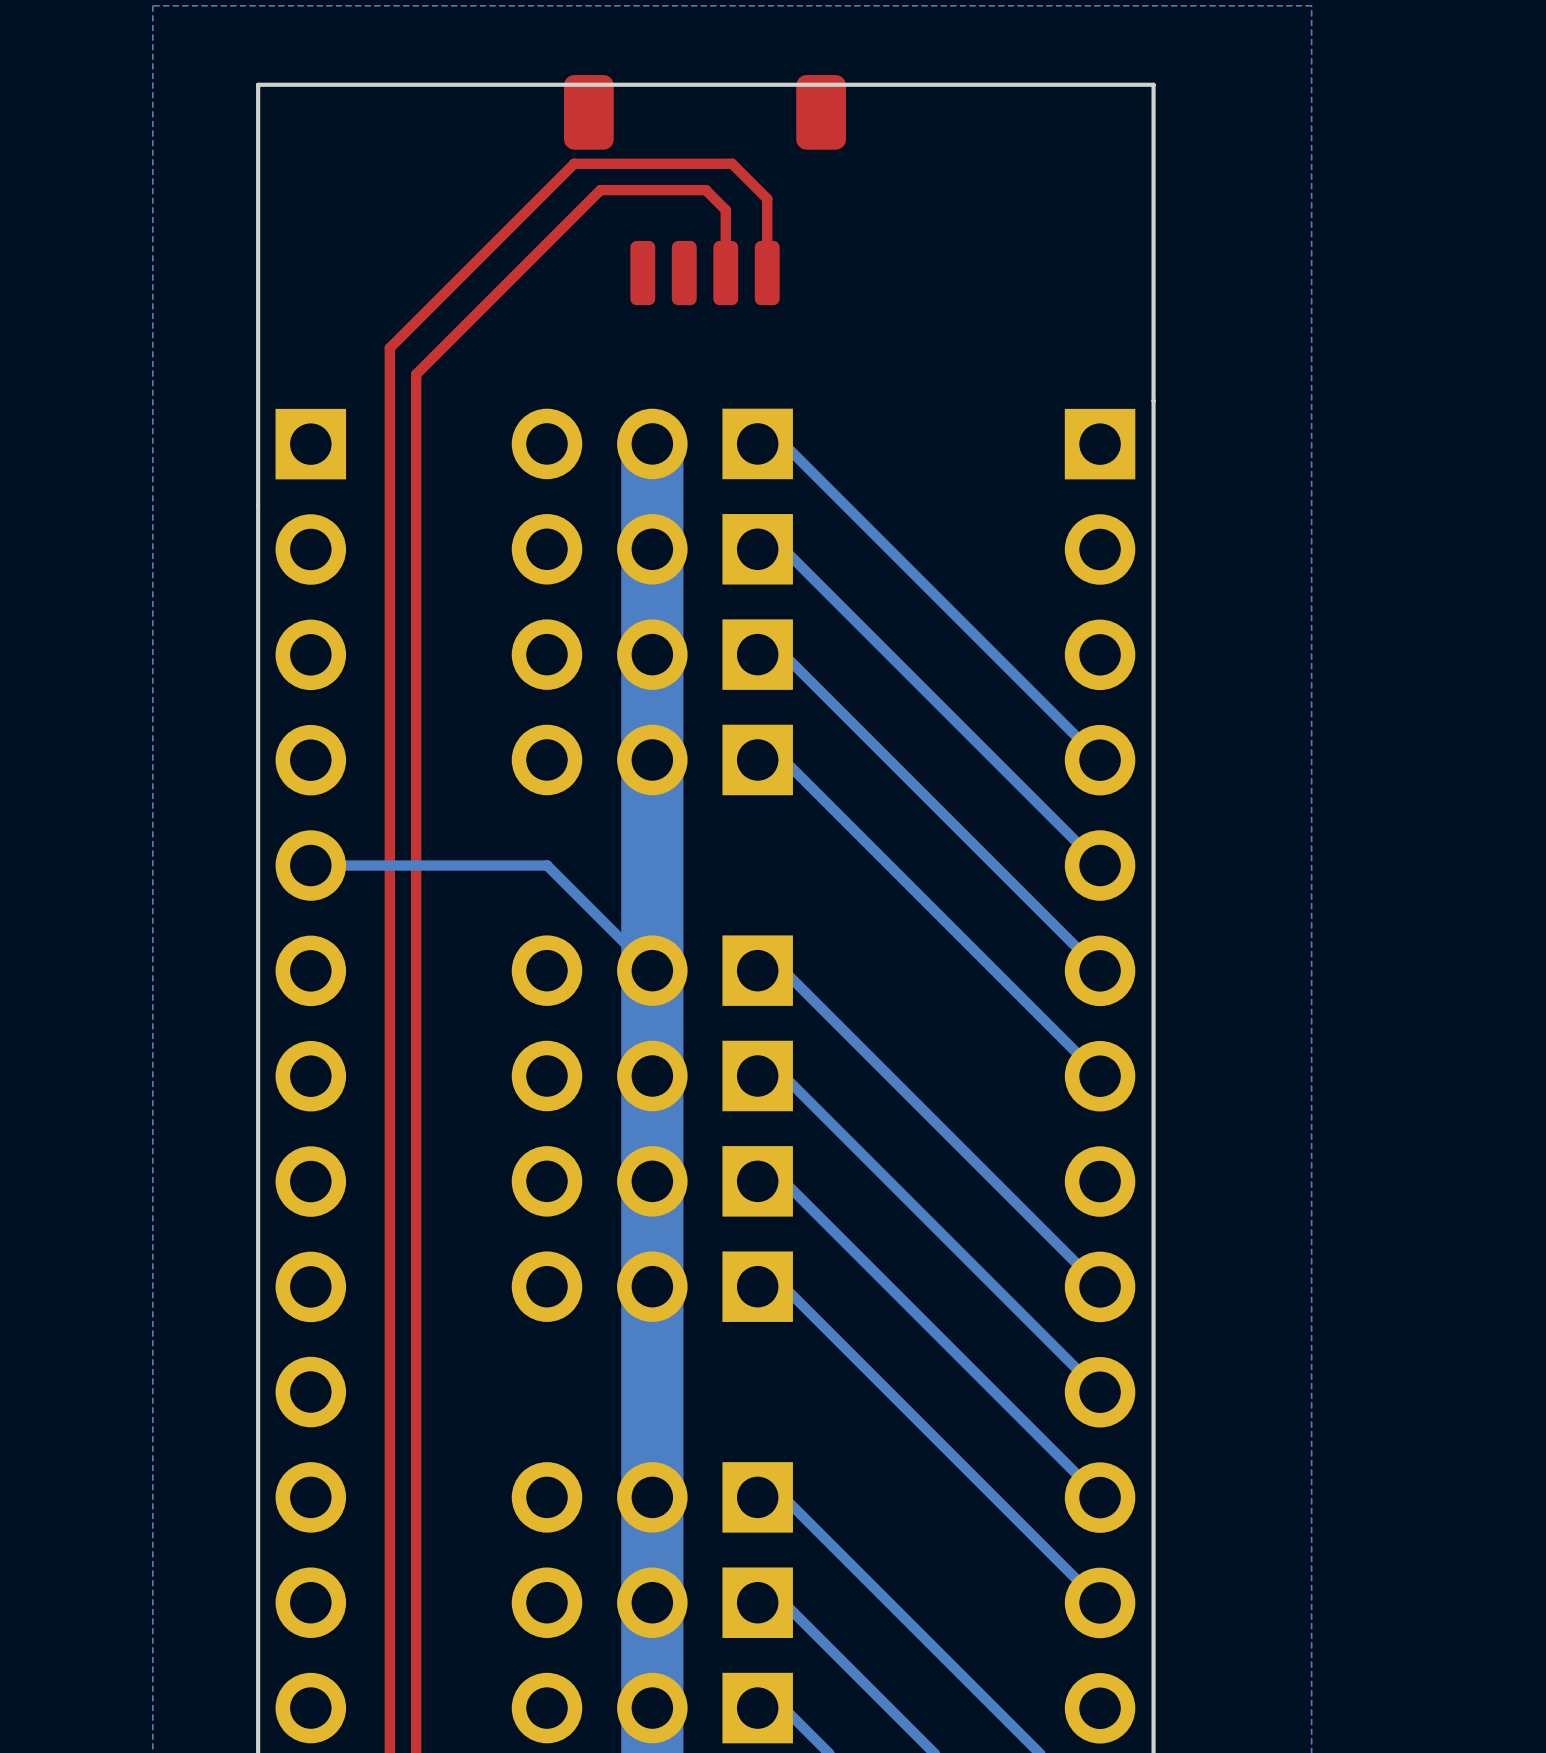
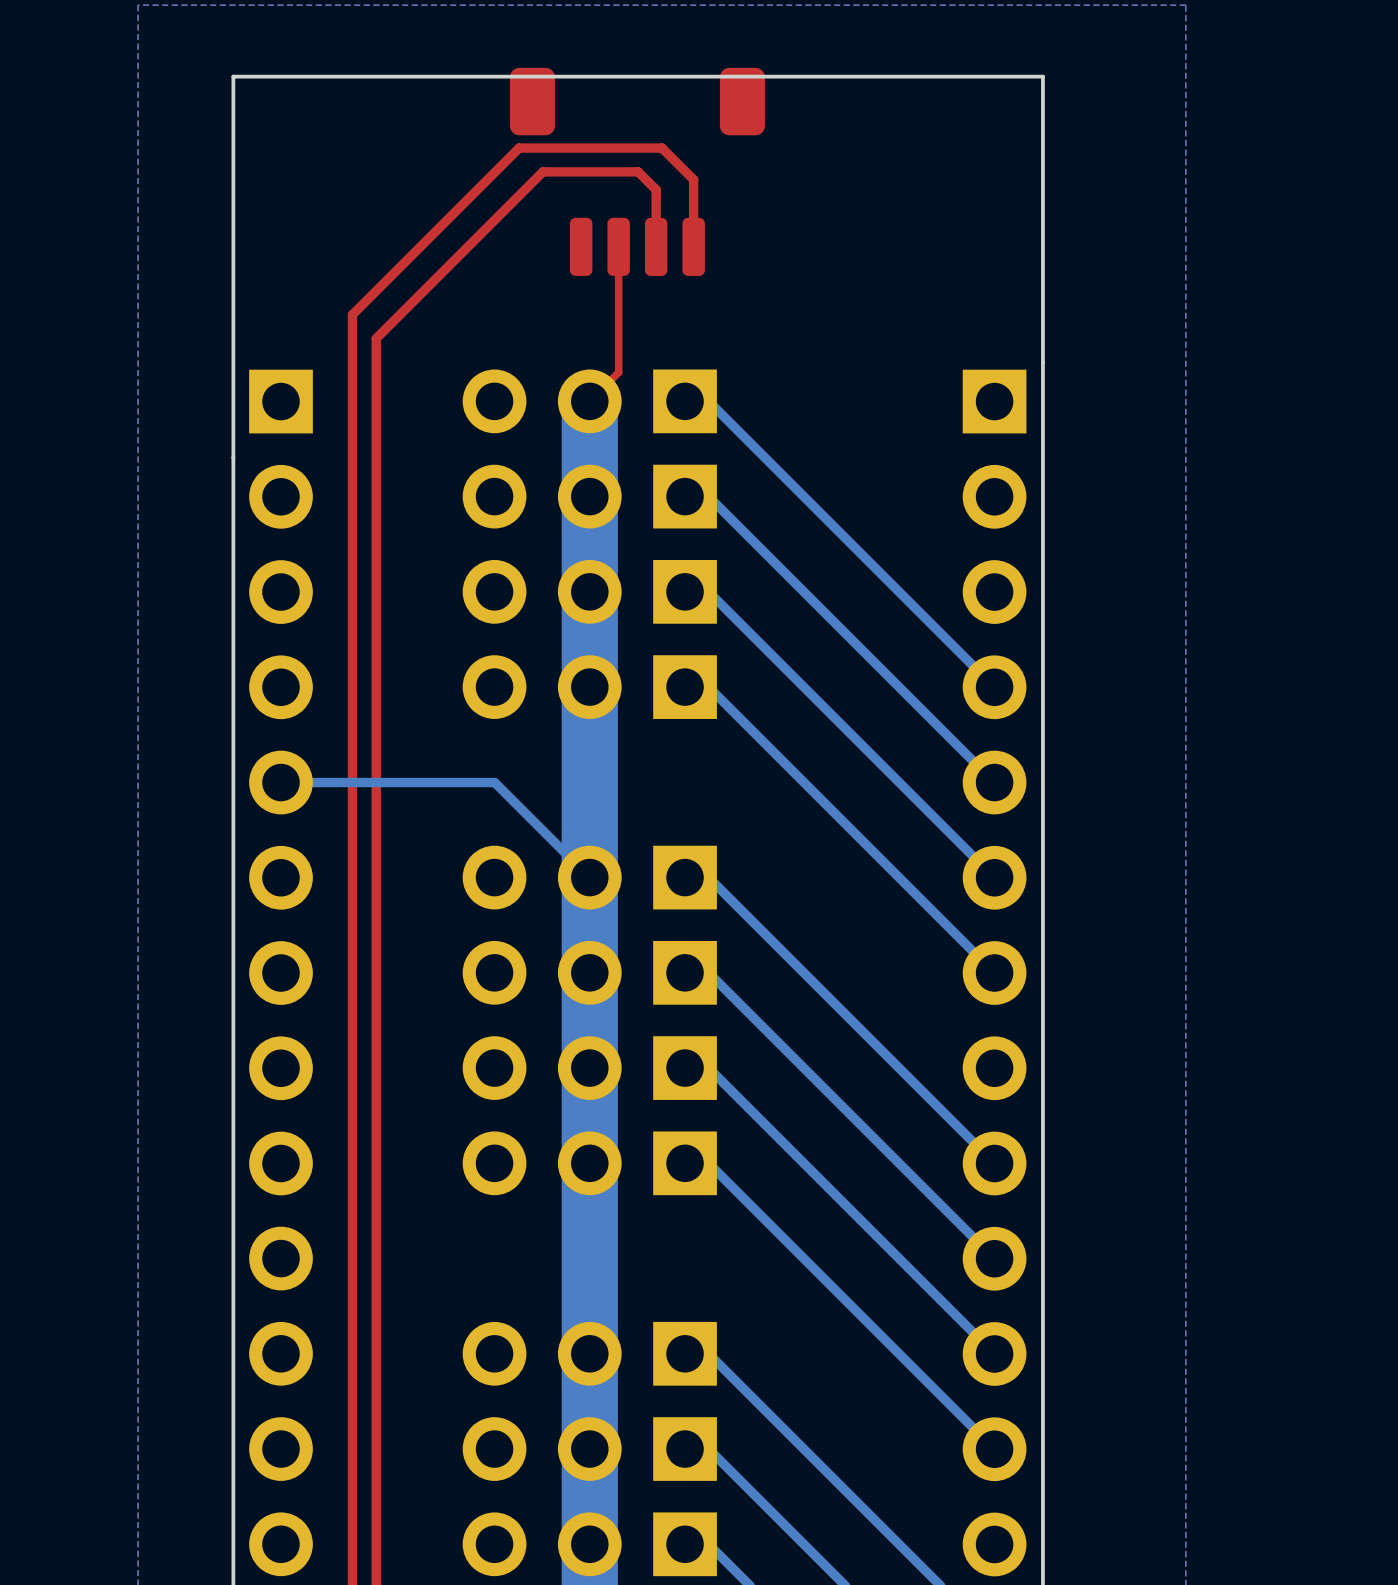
top track: none -> (618, 246) (618, 372) (589, 401)

